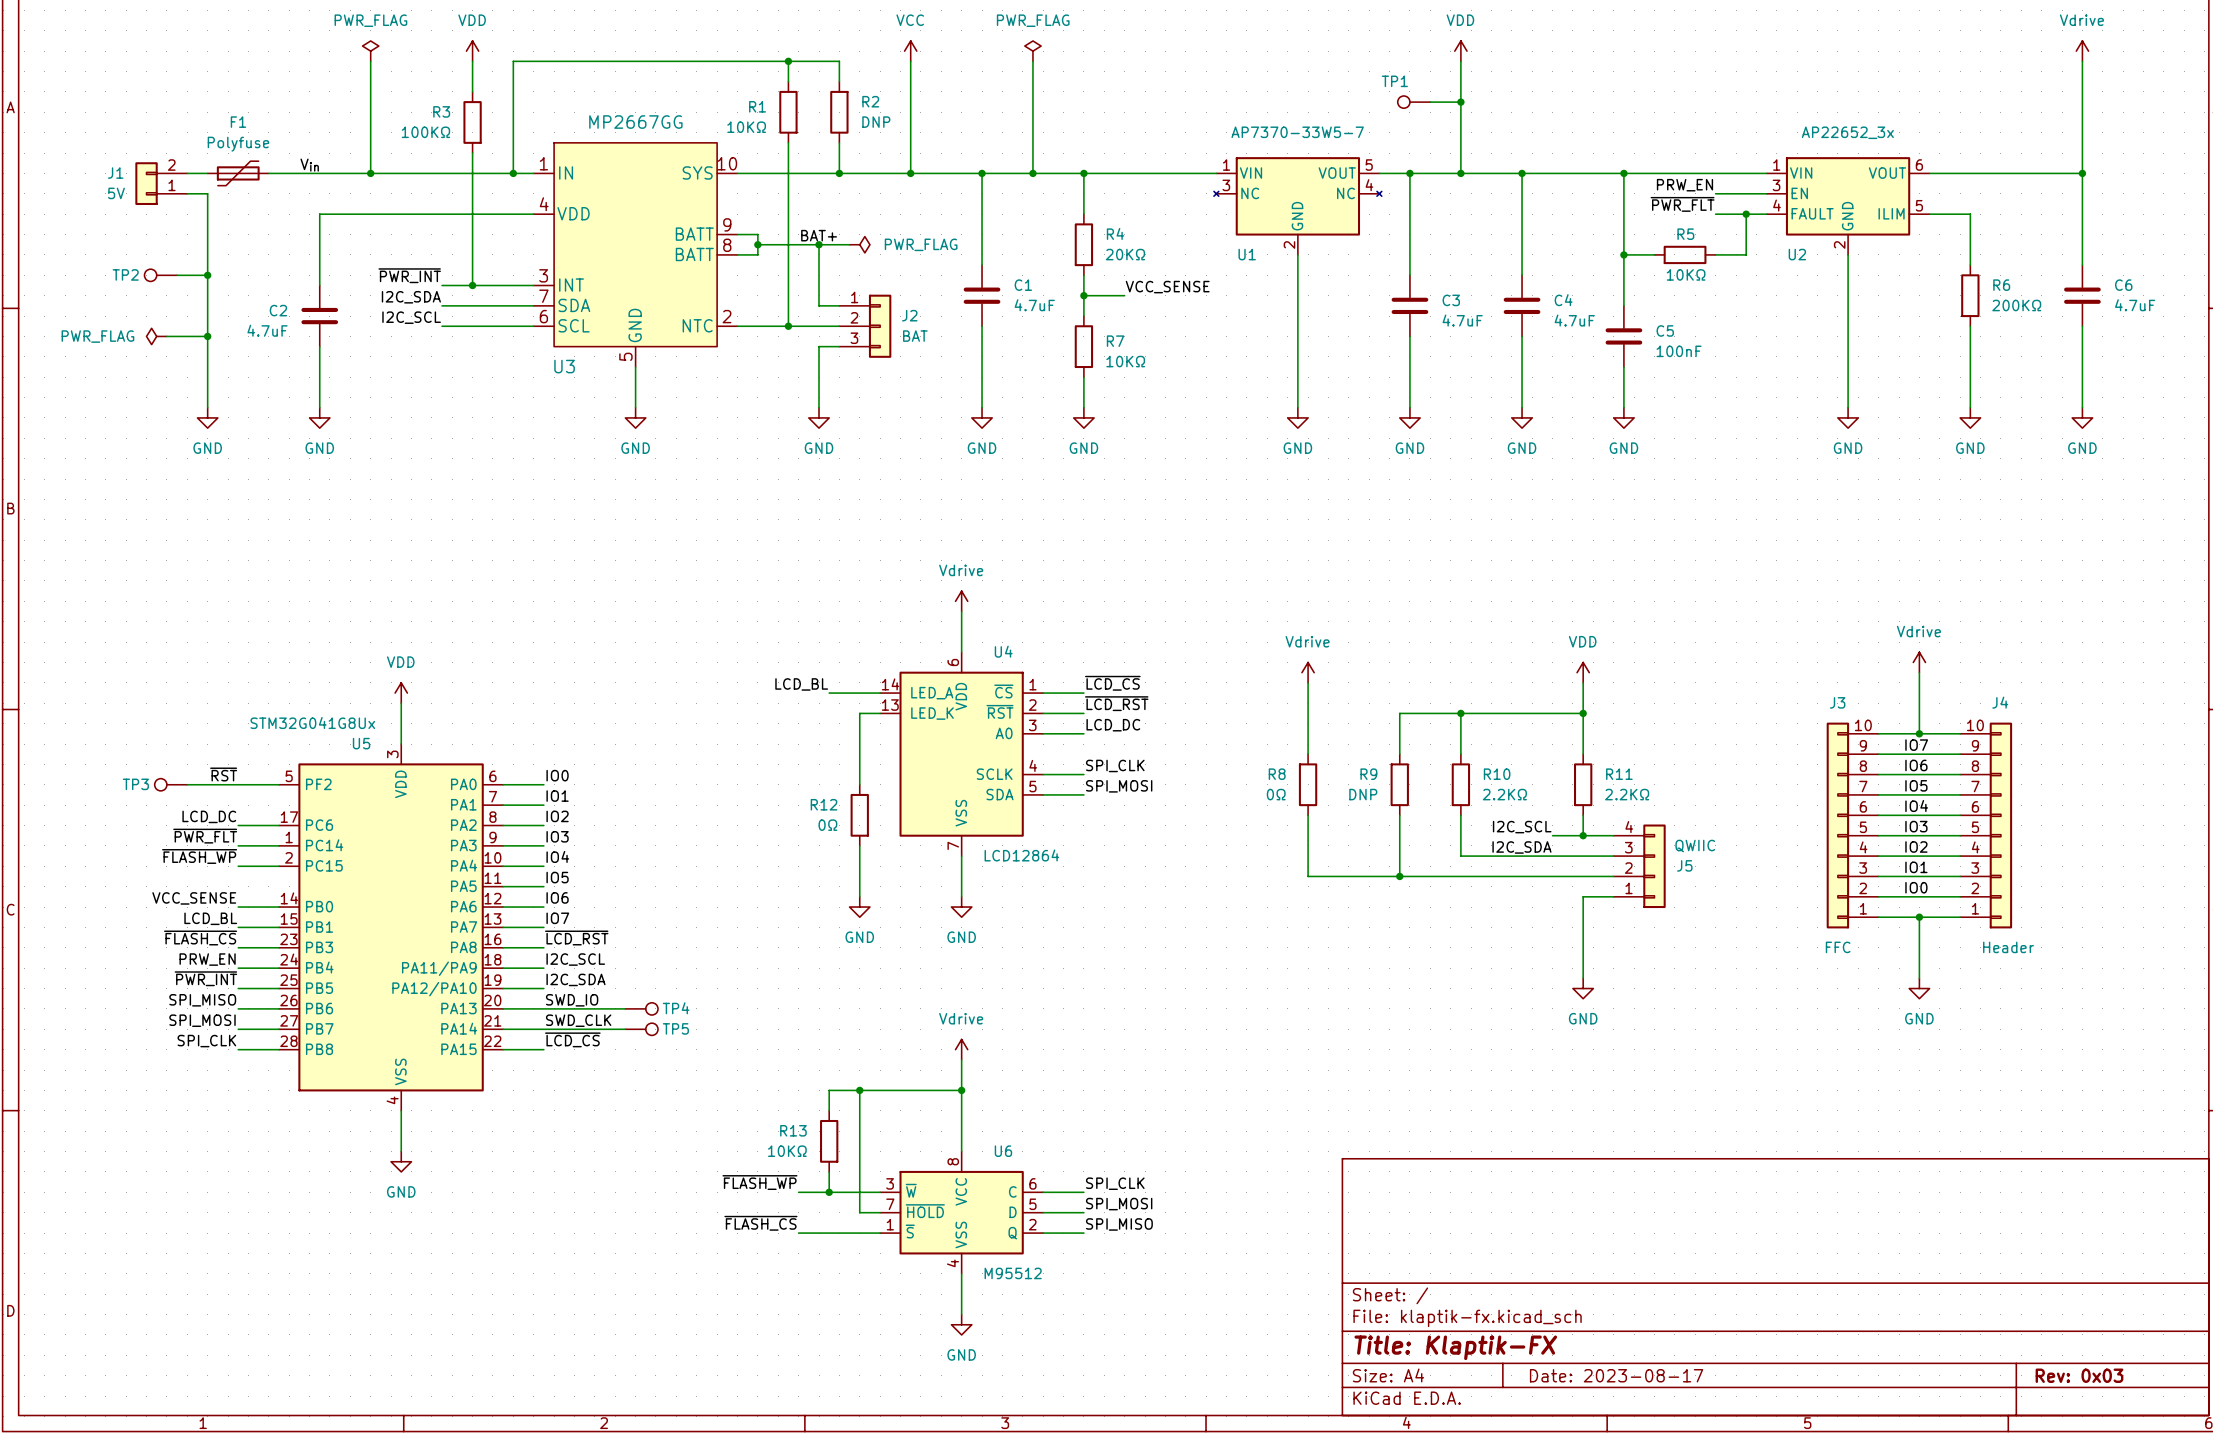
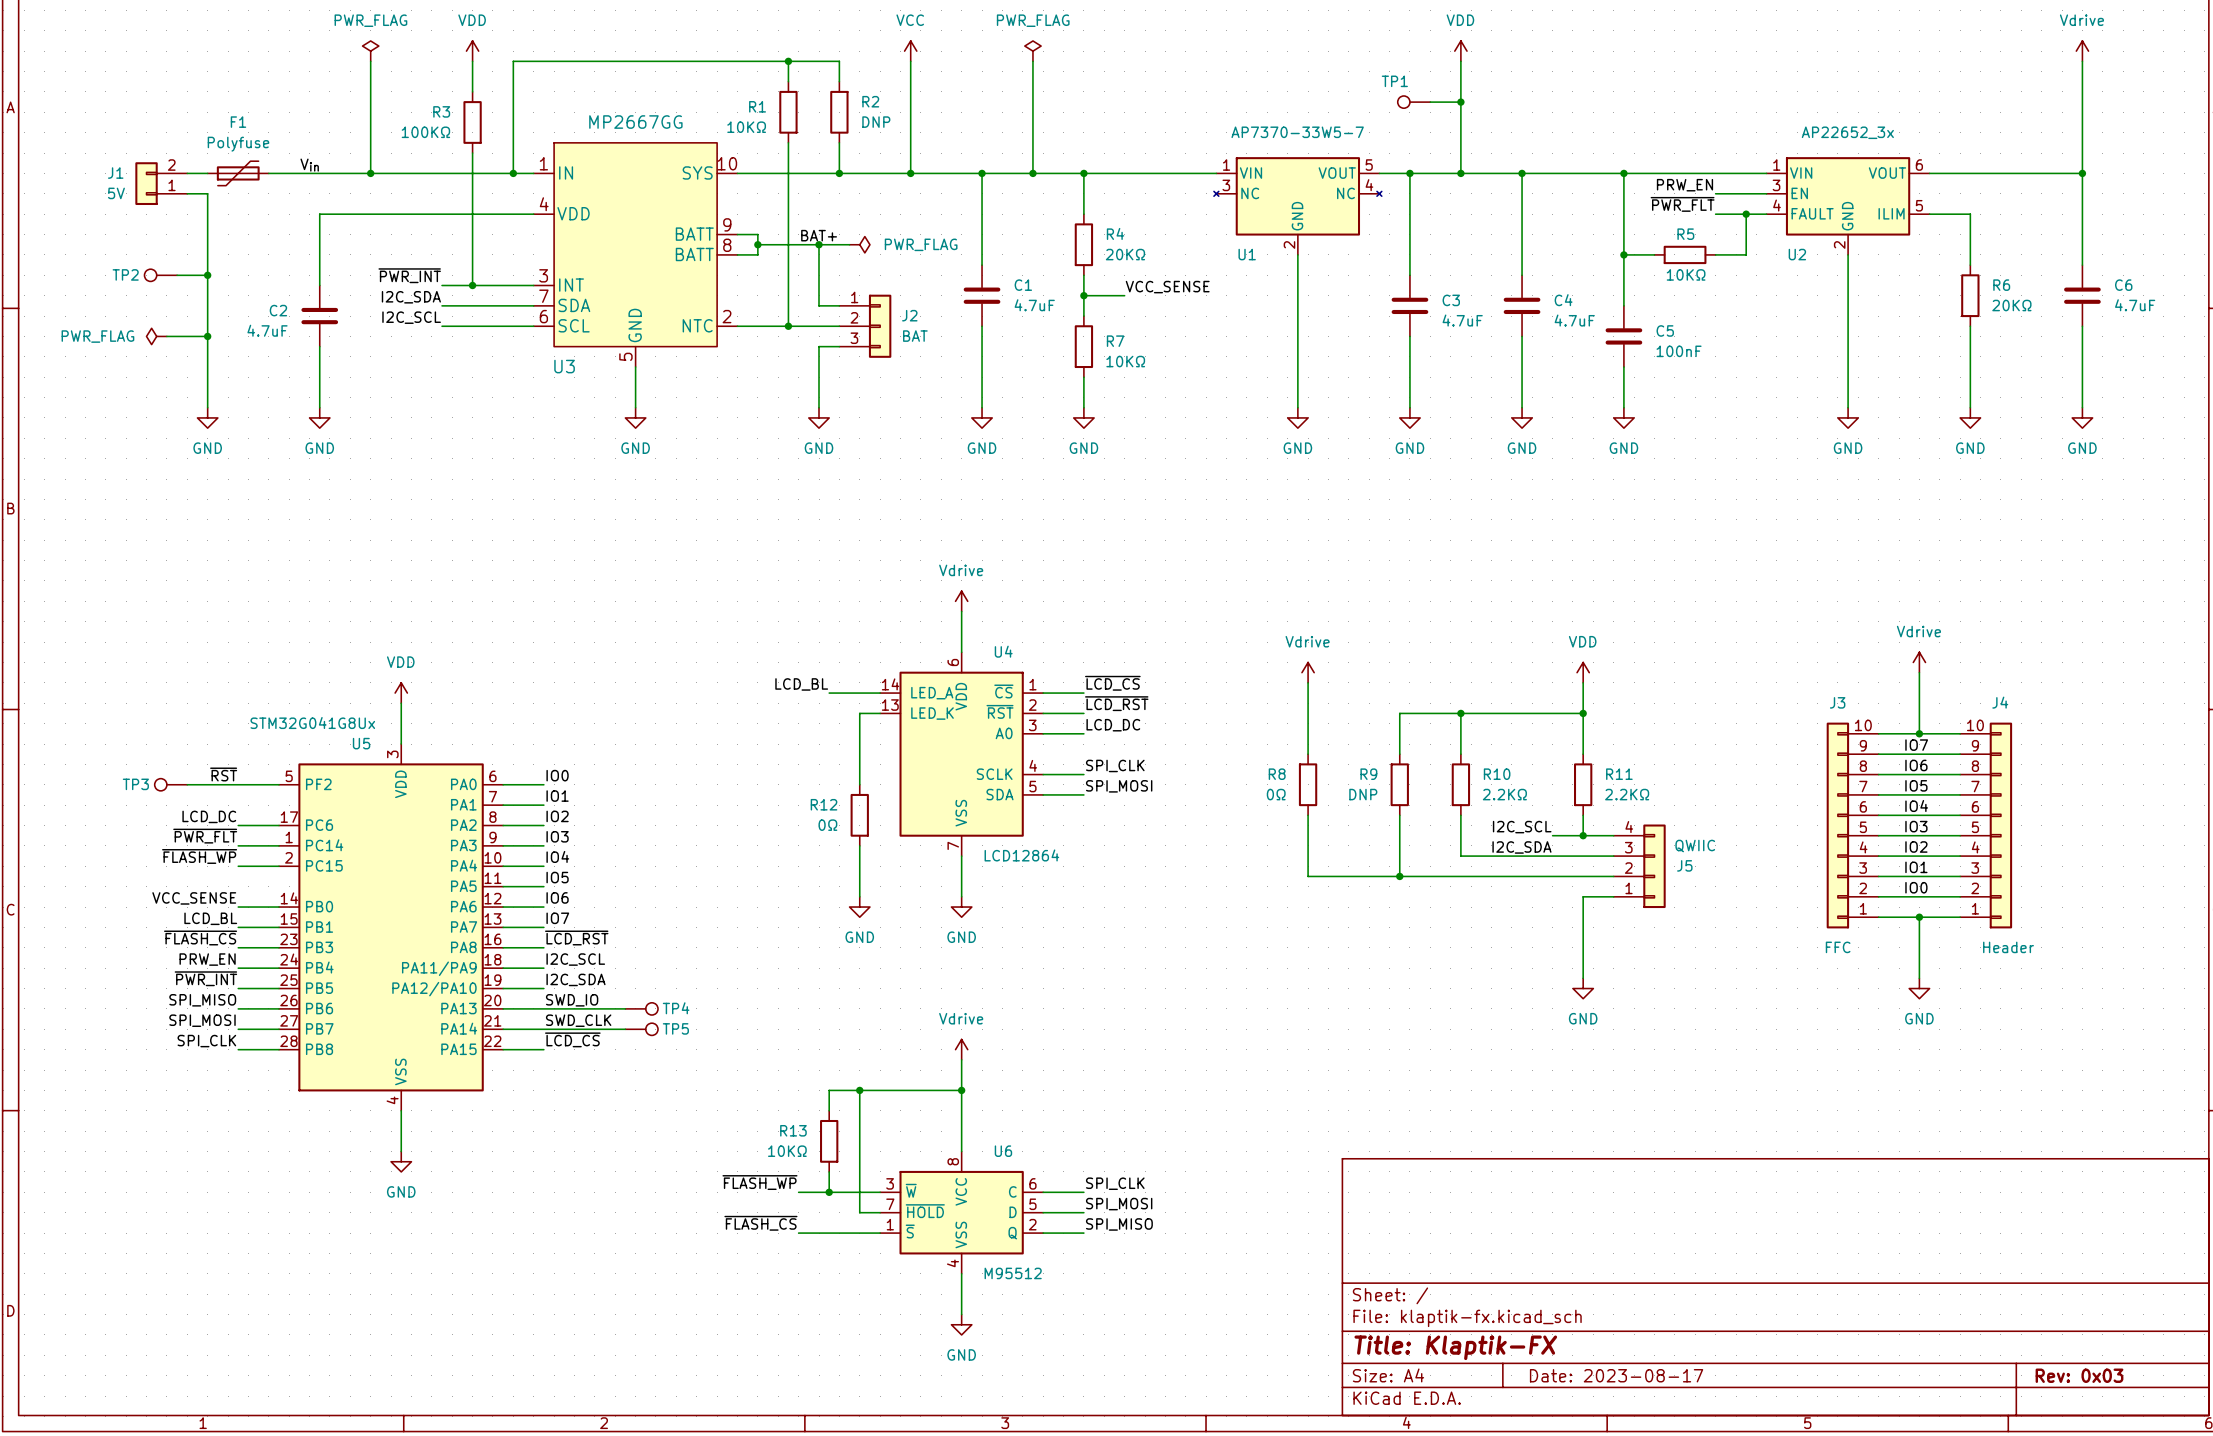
R6 value: 200KΩ (2016, 305) -> 20KΩ (2011, 305)

